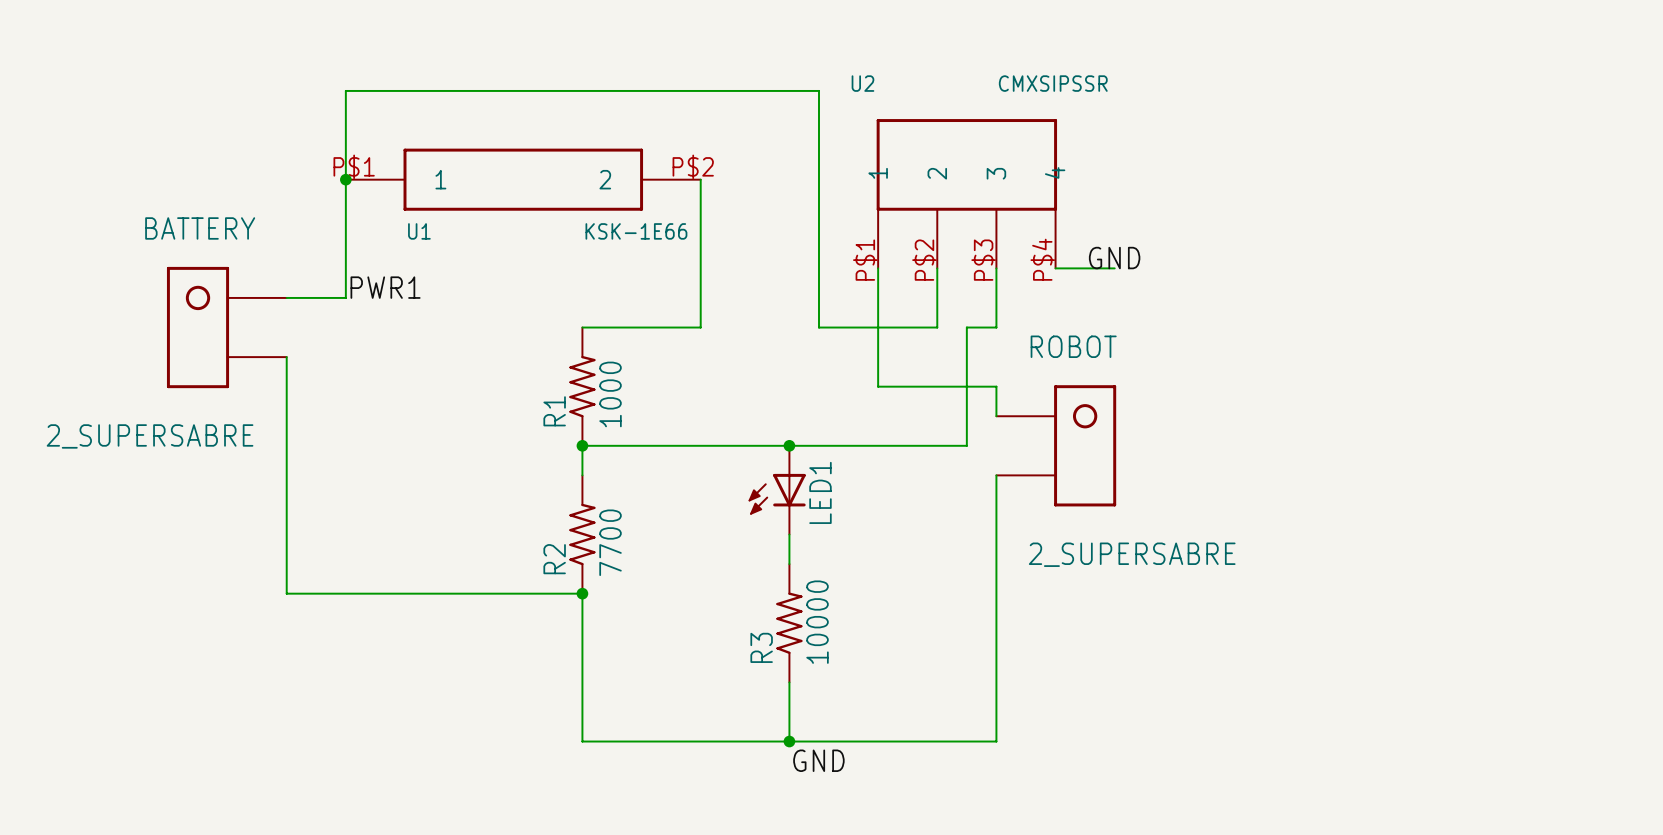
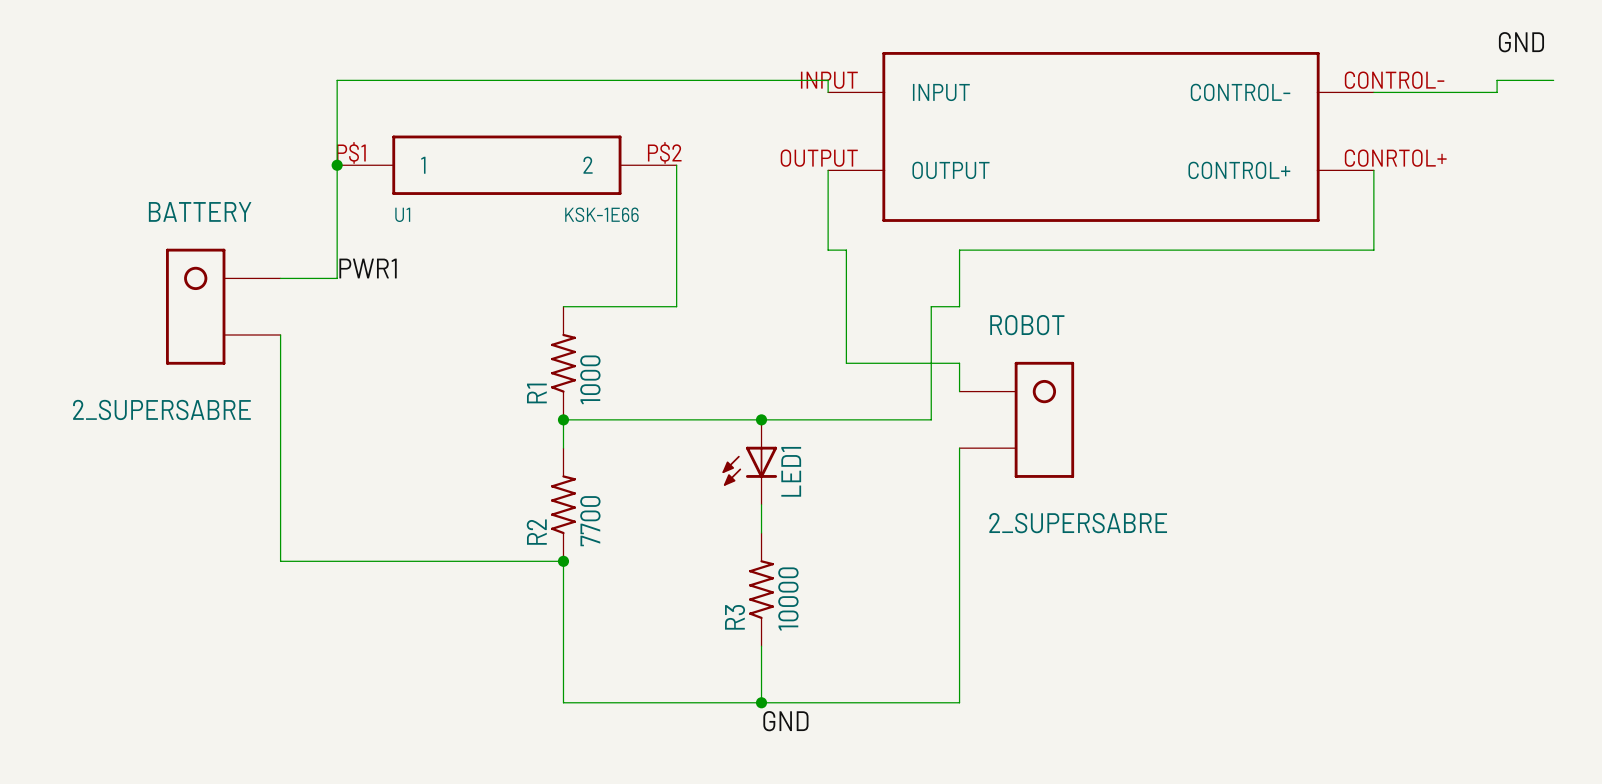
label: none -> GND (1521, 42)
wire: (818, 90) (818, 327) (937, 327) (937, 268) -> (789, 80) (828, 80) (828, 92)
wire: none -> (1553, 80) (1497, 80) (1497, 92) (1373, 92)
part: none -> (1101, 136)
wire: none -> (828, 170) (828, 250) (846, 250)
wire: none -> (1373, 170) (1373, 250) (1072, 250)
U2: CMXSIPSSR (966, 193) -> none
label: GND (1114, 258) -> none
wire: none -> (959, 250) (1016, 250)

